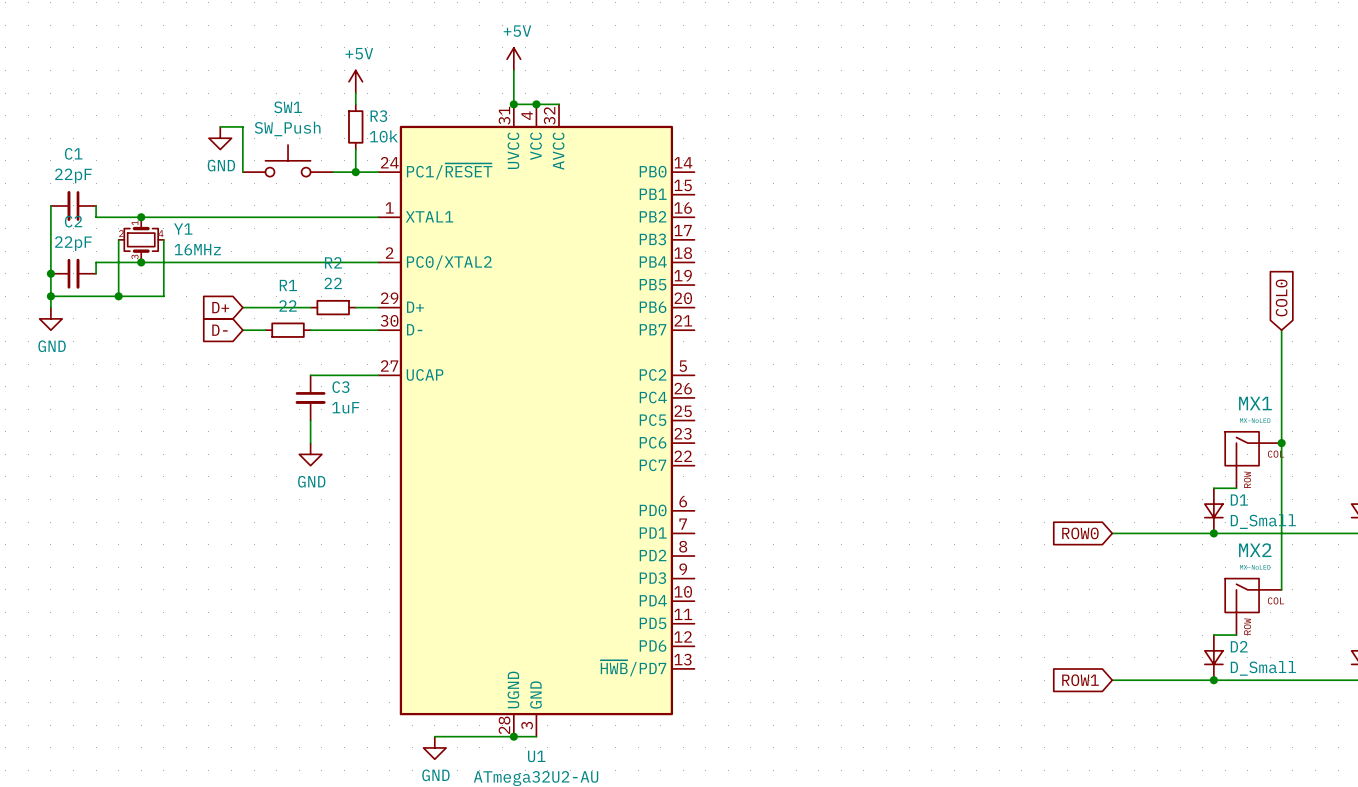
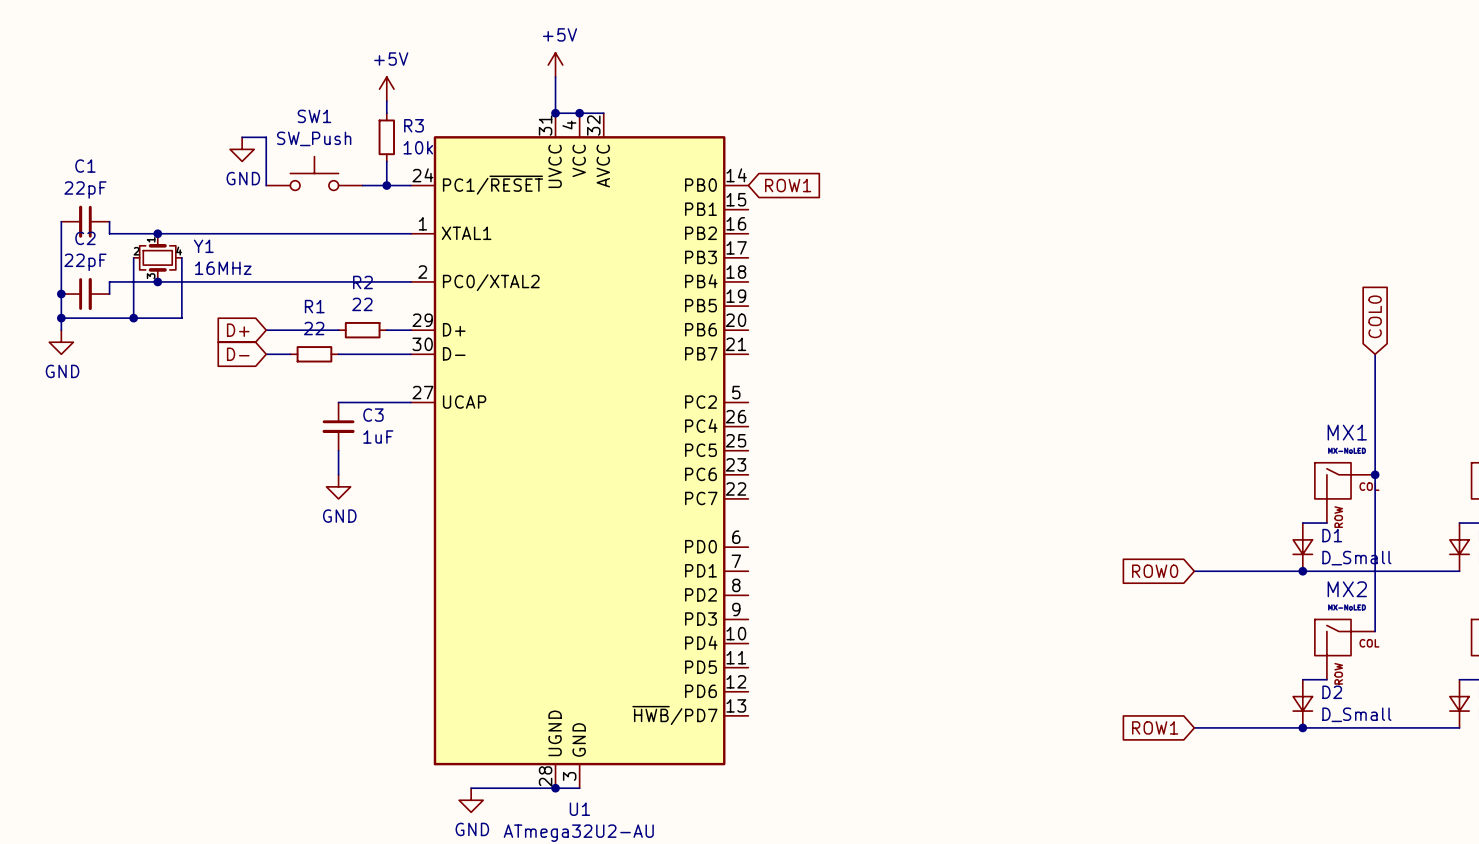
global label: none -> ROW1 (788, 185)

